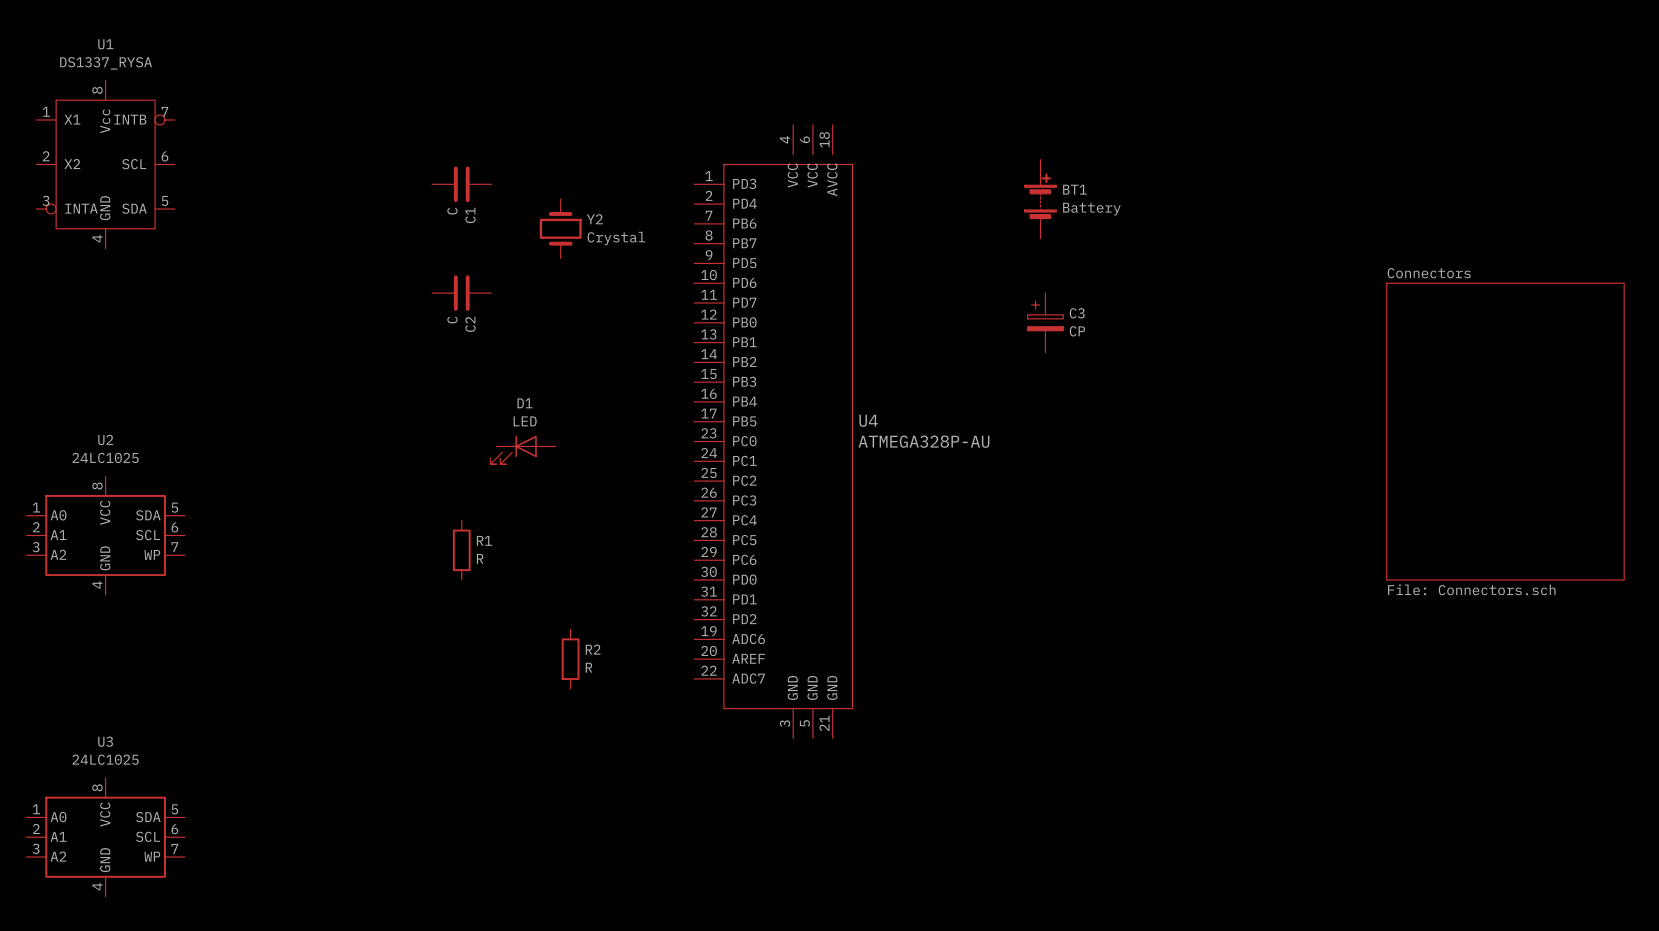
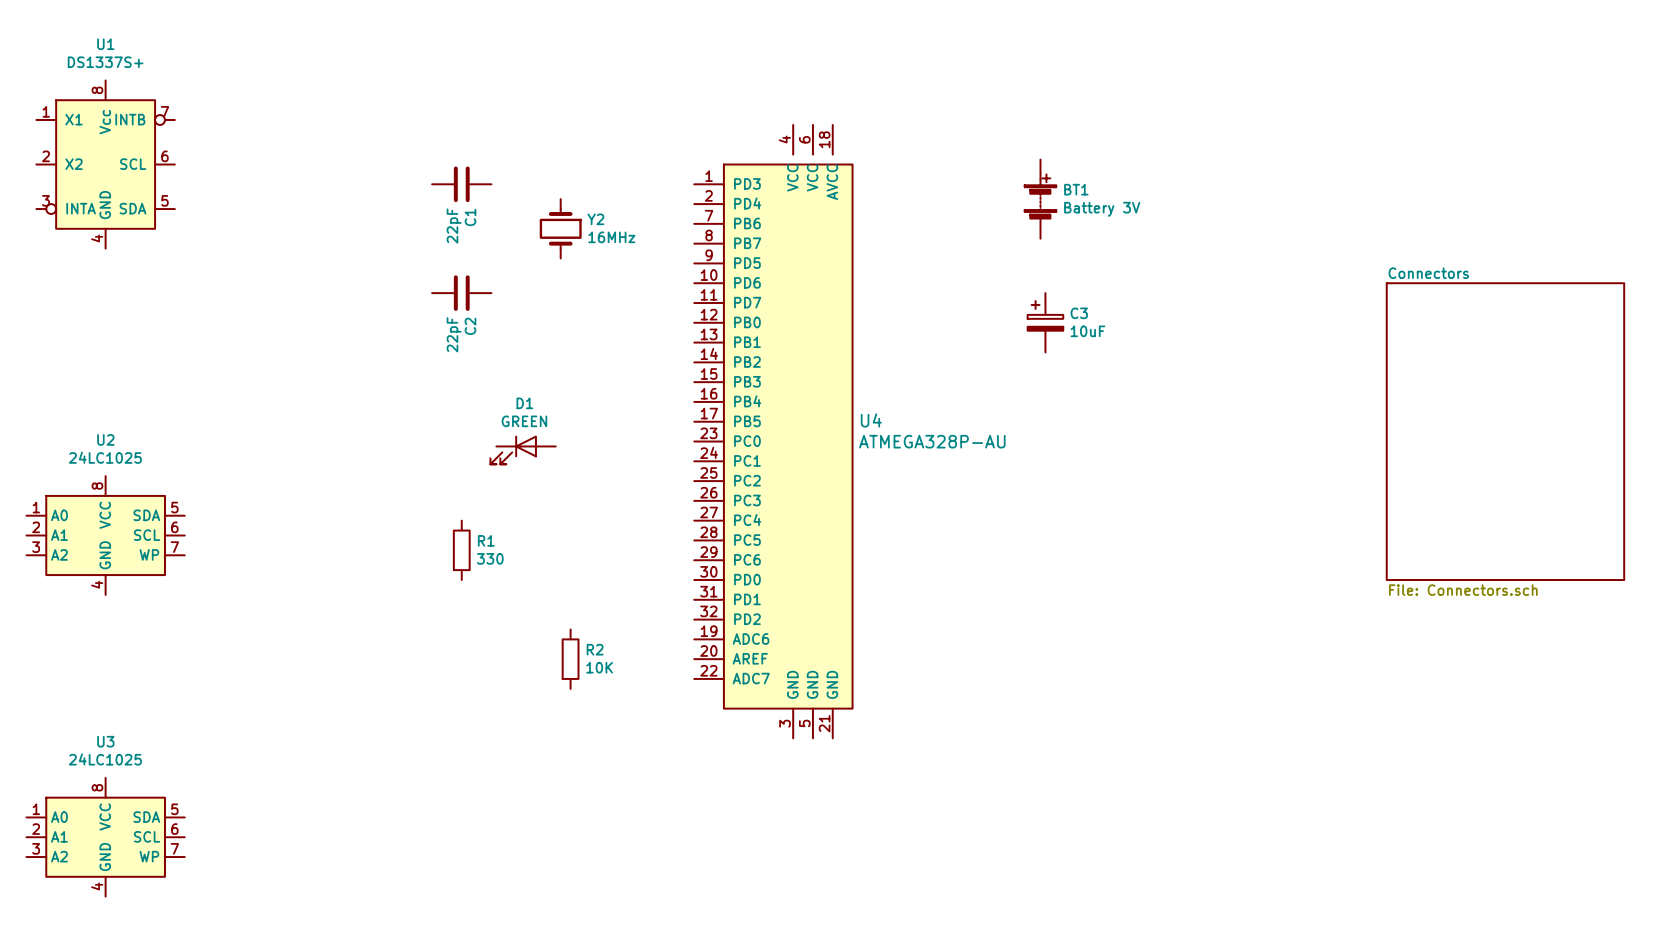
U1 value: DS1337_RYSA (106, 63) -> DS1337S+ (105, 62)
BT1 value: Battery (1091, 209) -> Battery 3V (1102, 209)
C1 value: C (452, 211) -> 22pF (454, 225)
Y2 value: Crystal (616, 238) -> 16MHz (611, 237)
C2 value: C (452, 320) -> 22pF (454, 334)
C3 value: CP (1077, 331) -> 10uF (1087, 331)
D1 value: LED (525, 421) -> GREEN (524, 421)
R1 value: R (480, 558) -> 330 (490, 558)
R2 value: R (588, 667) -> 10K (599, 667)

